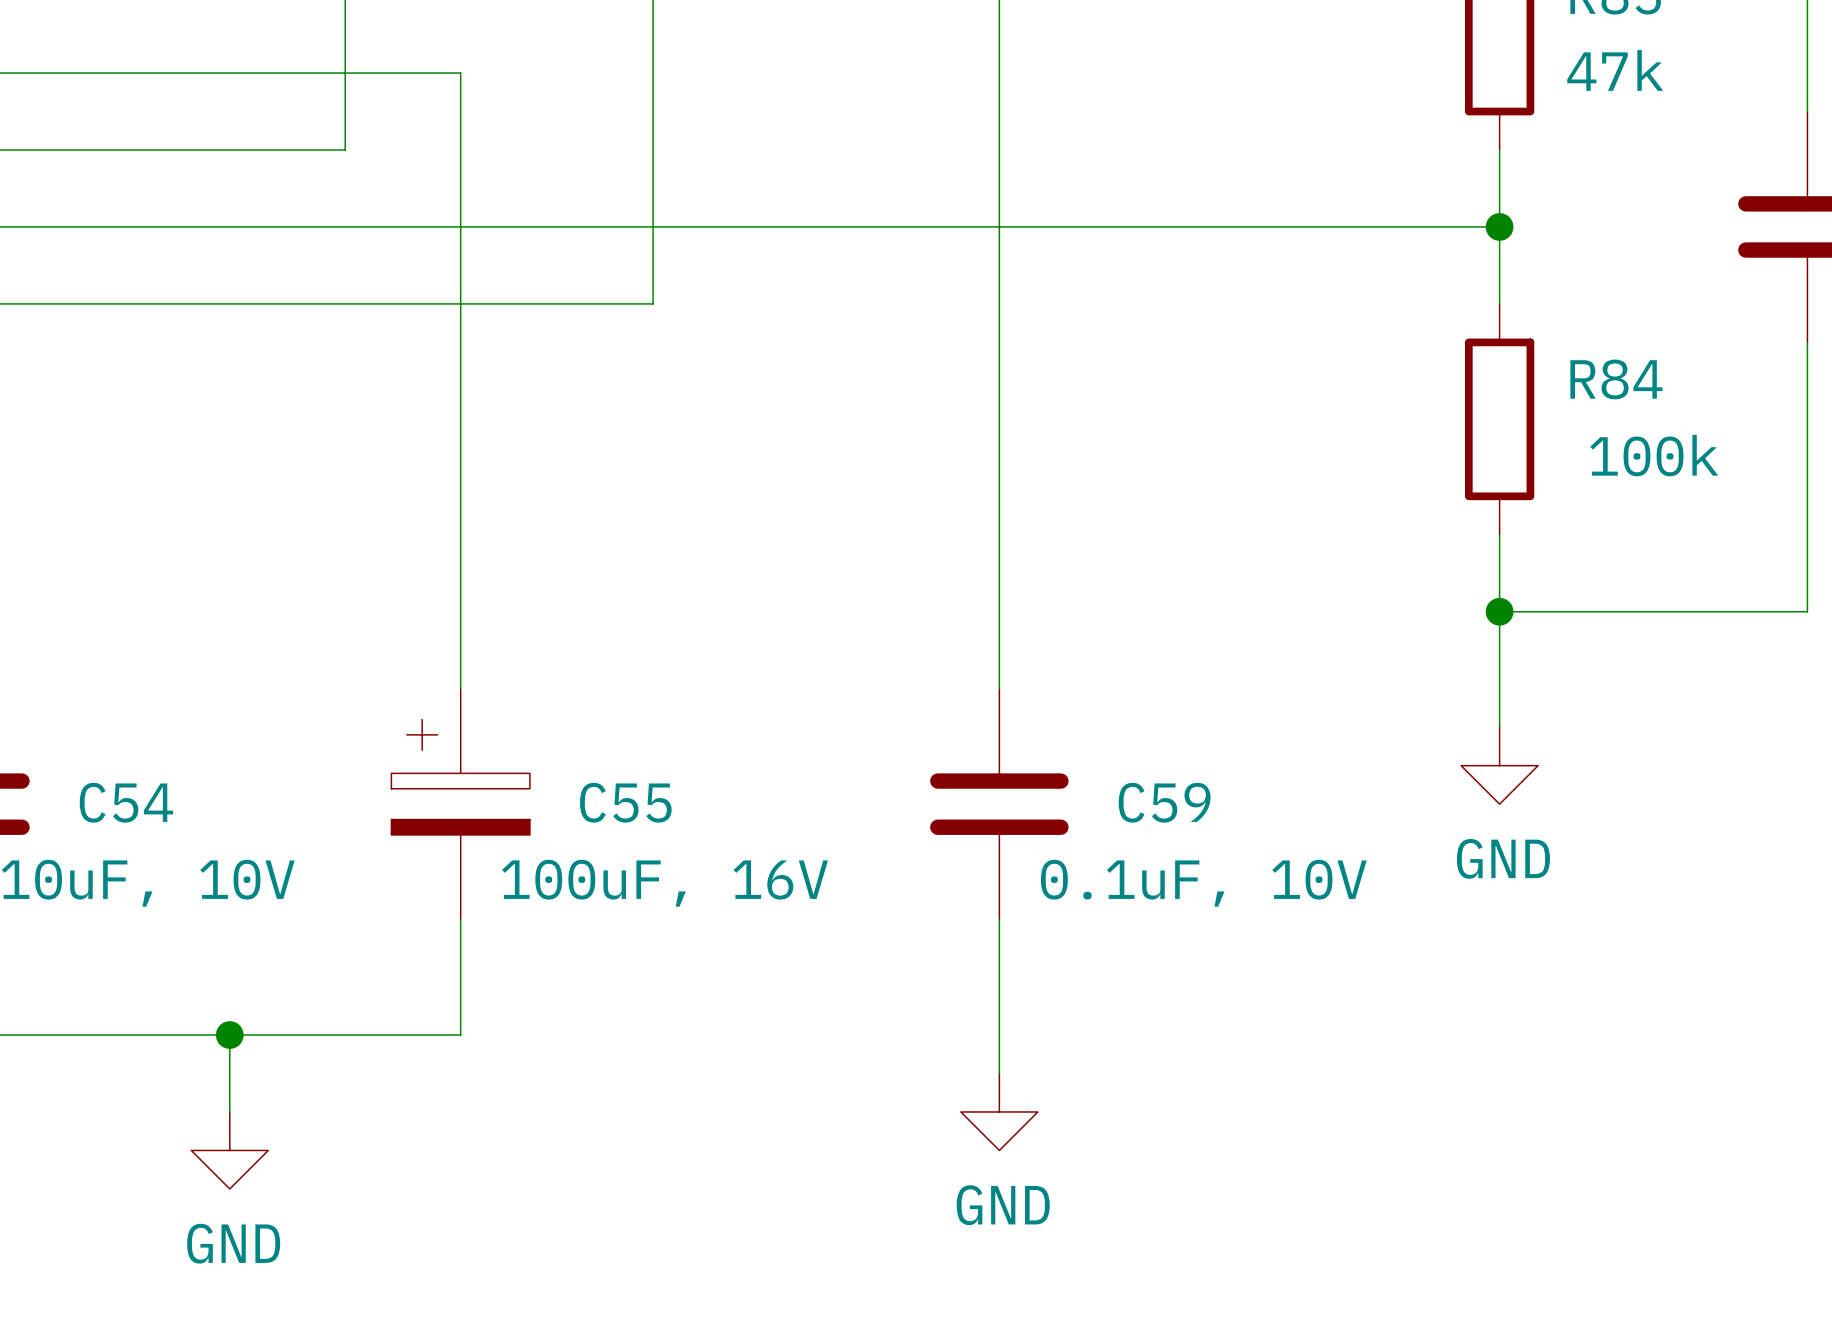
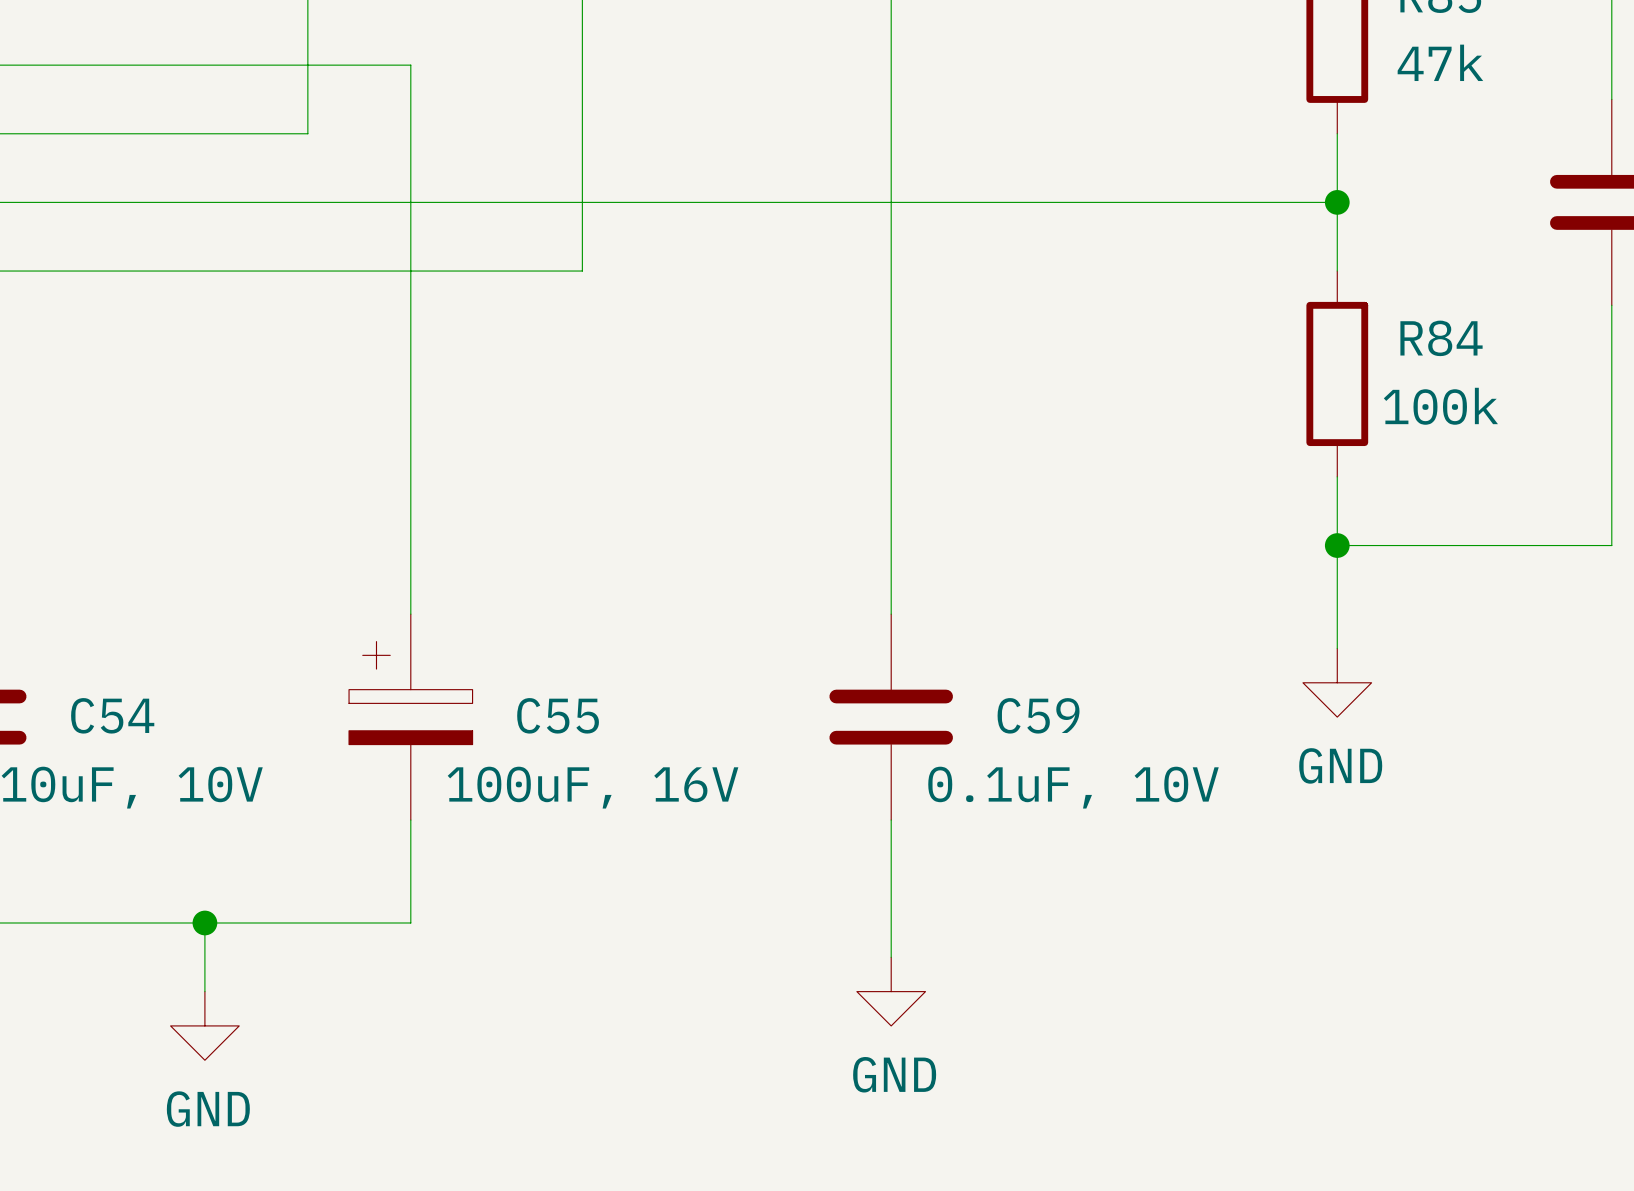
R84 value position: 100k (1654, 455) -> 100k (1440, 406)

